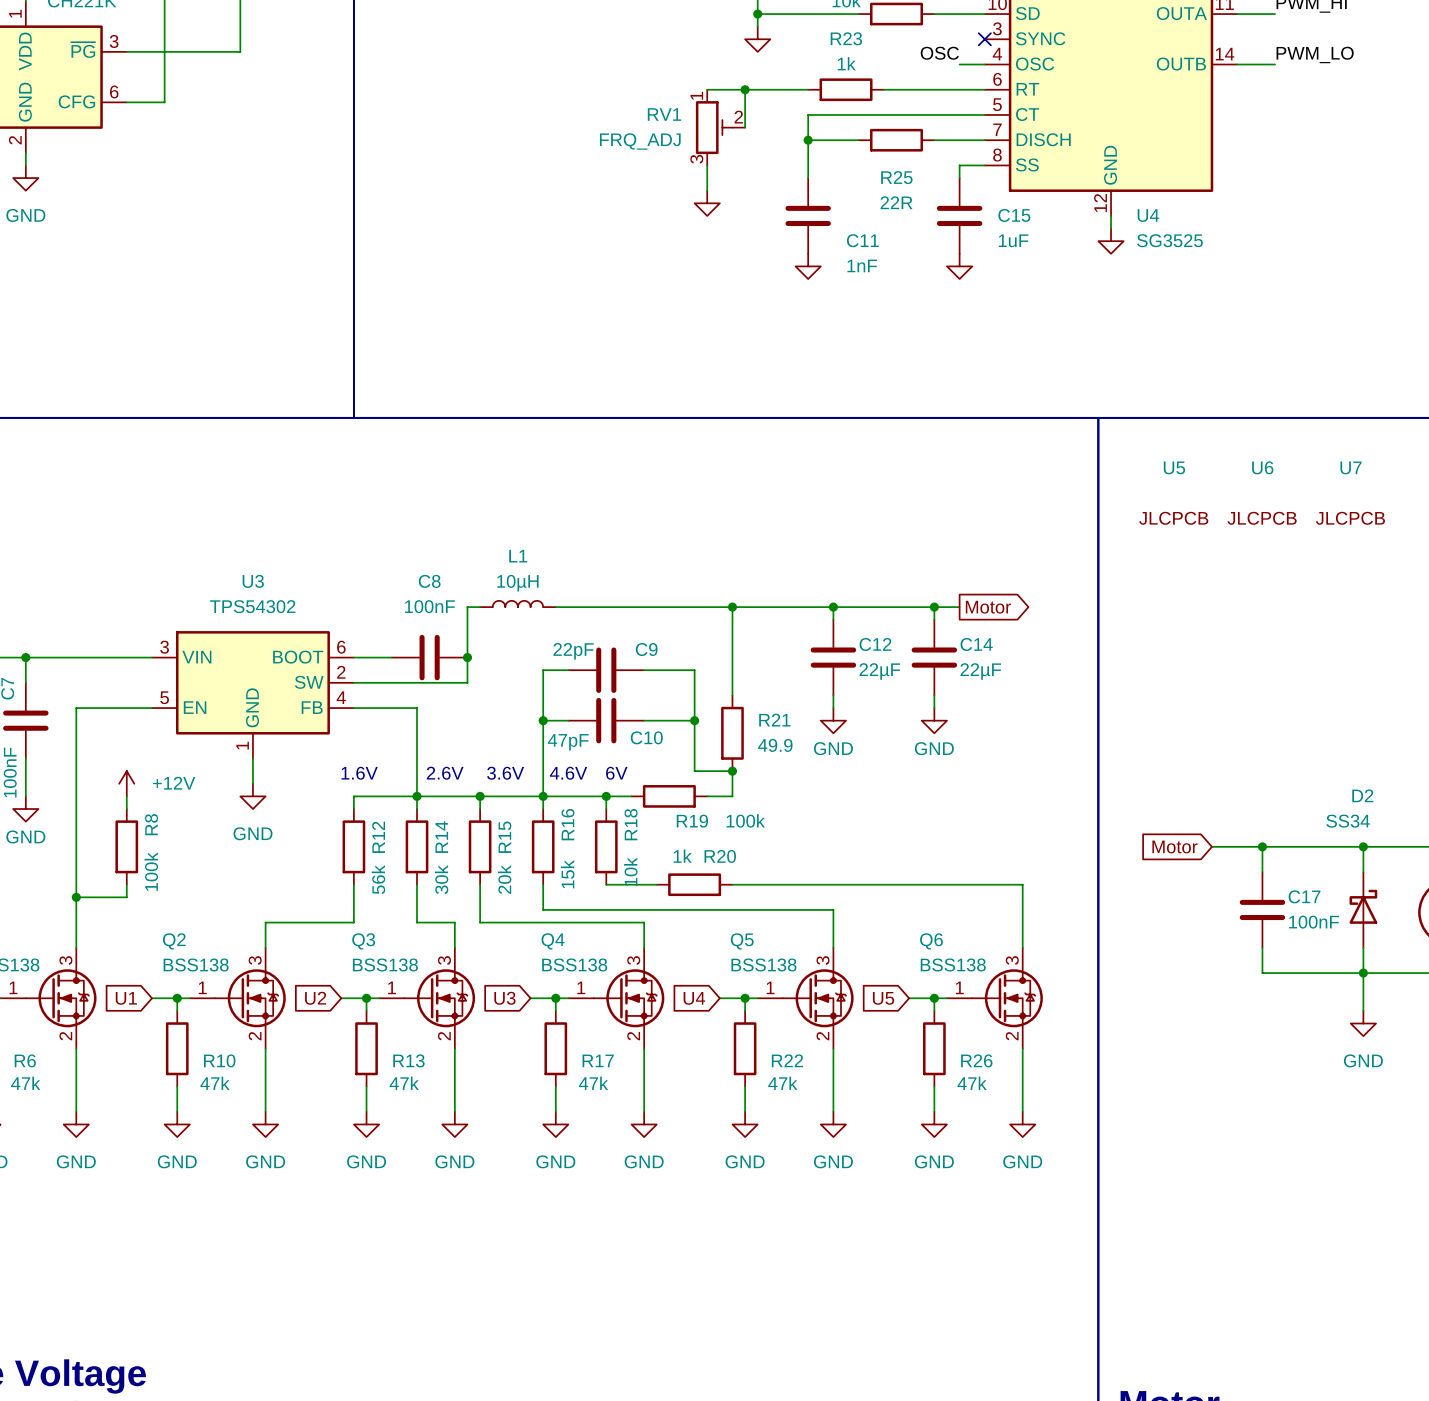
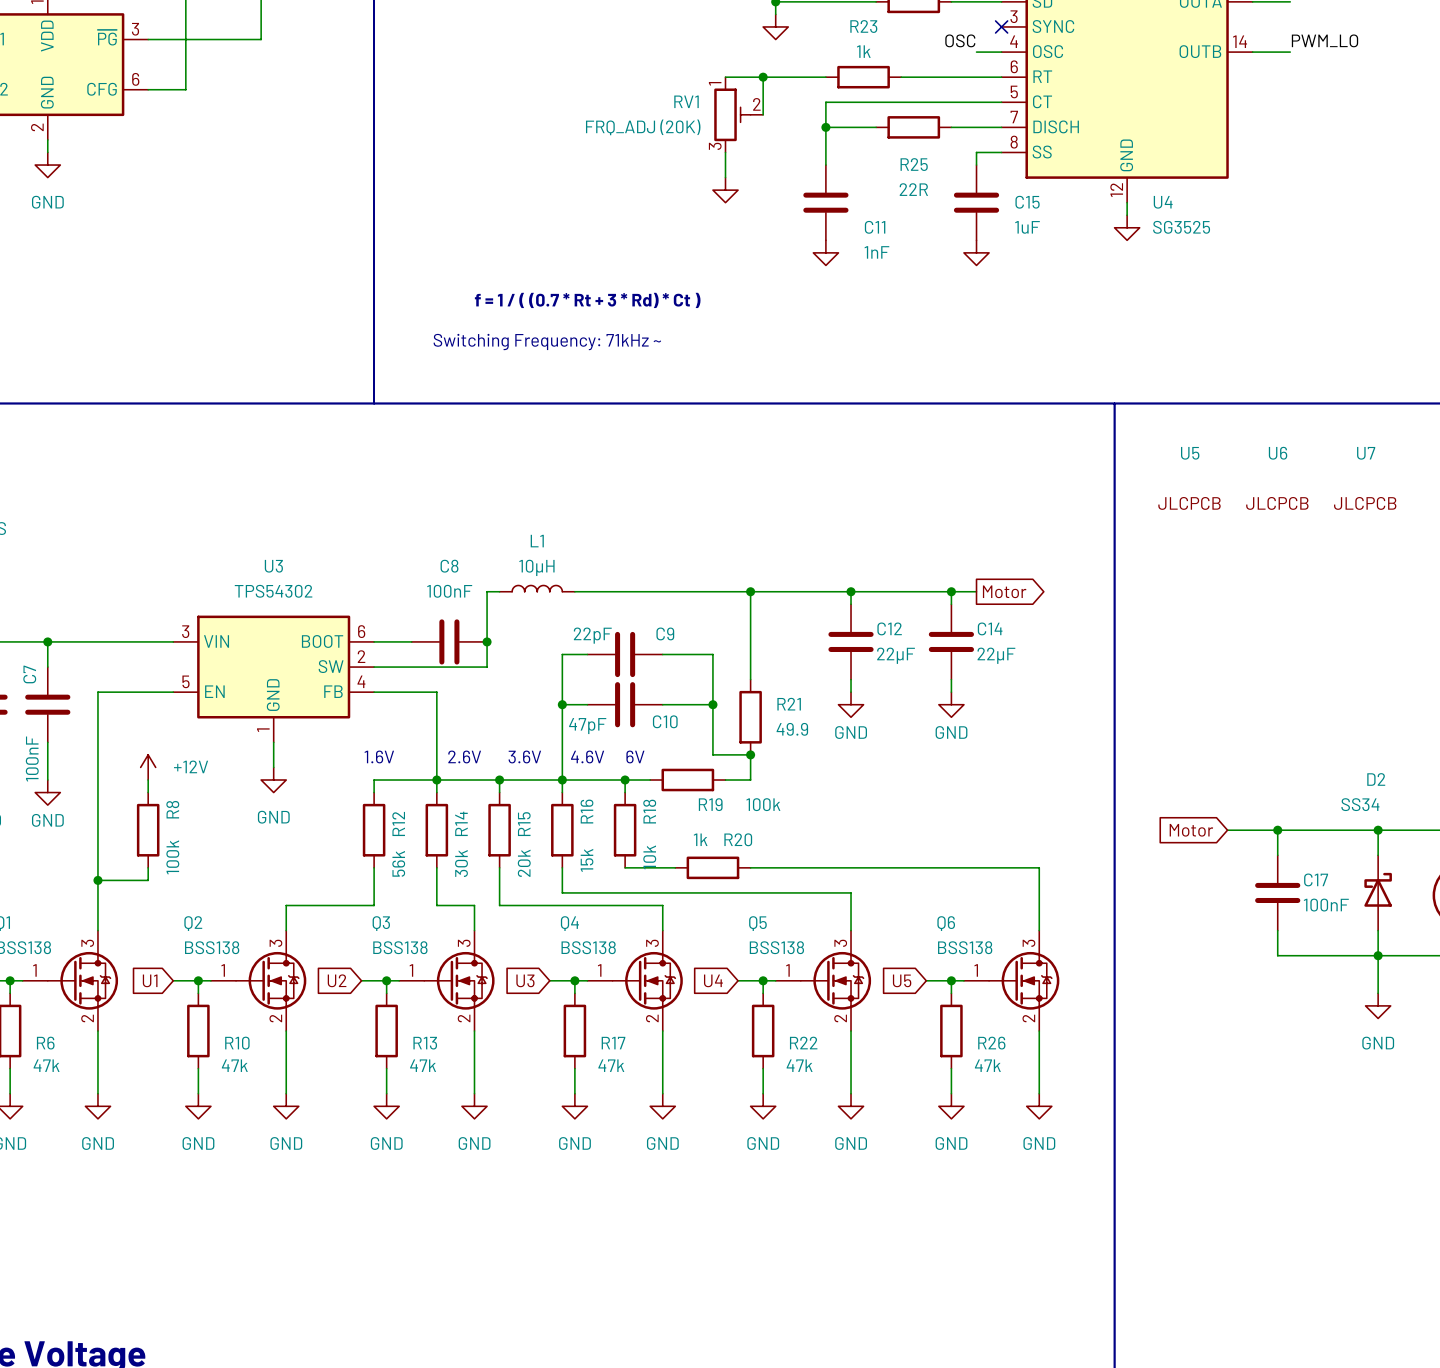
RV1 value: FRQ_ADJ (640, 141) -> FRQ_ADJ (20K) (643, 127)
text: none -> f = 1 / ( (0.7 * Rt + 3 * Rd) * Ct ) (587, 300)
text: none -> Switching Frequency: 71kHz ~ (547, 342)

